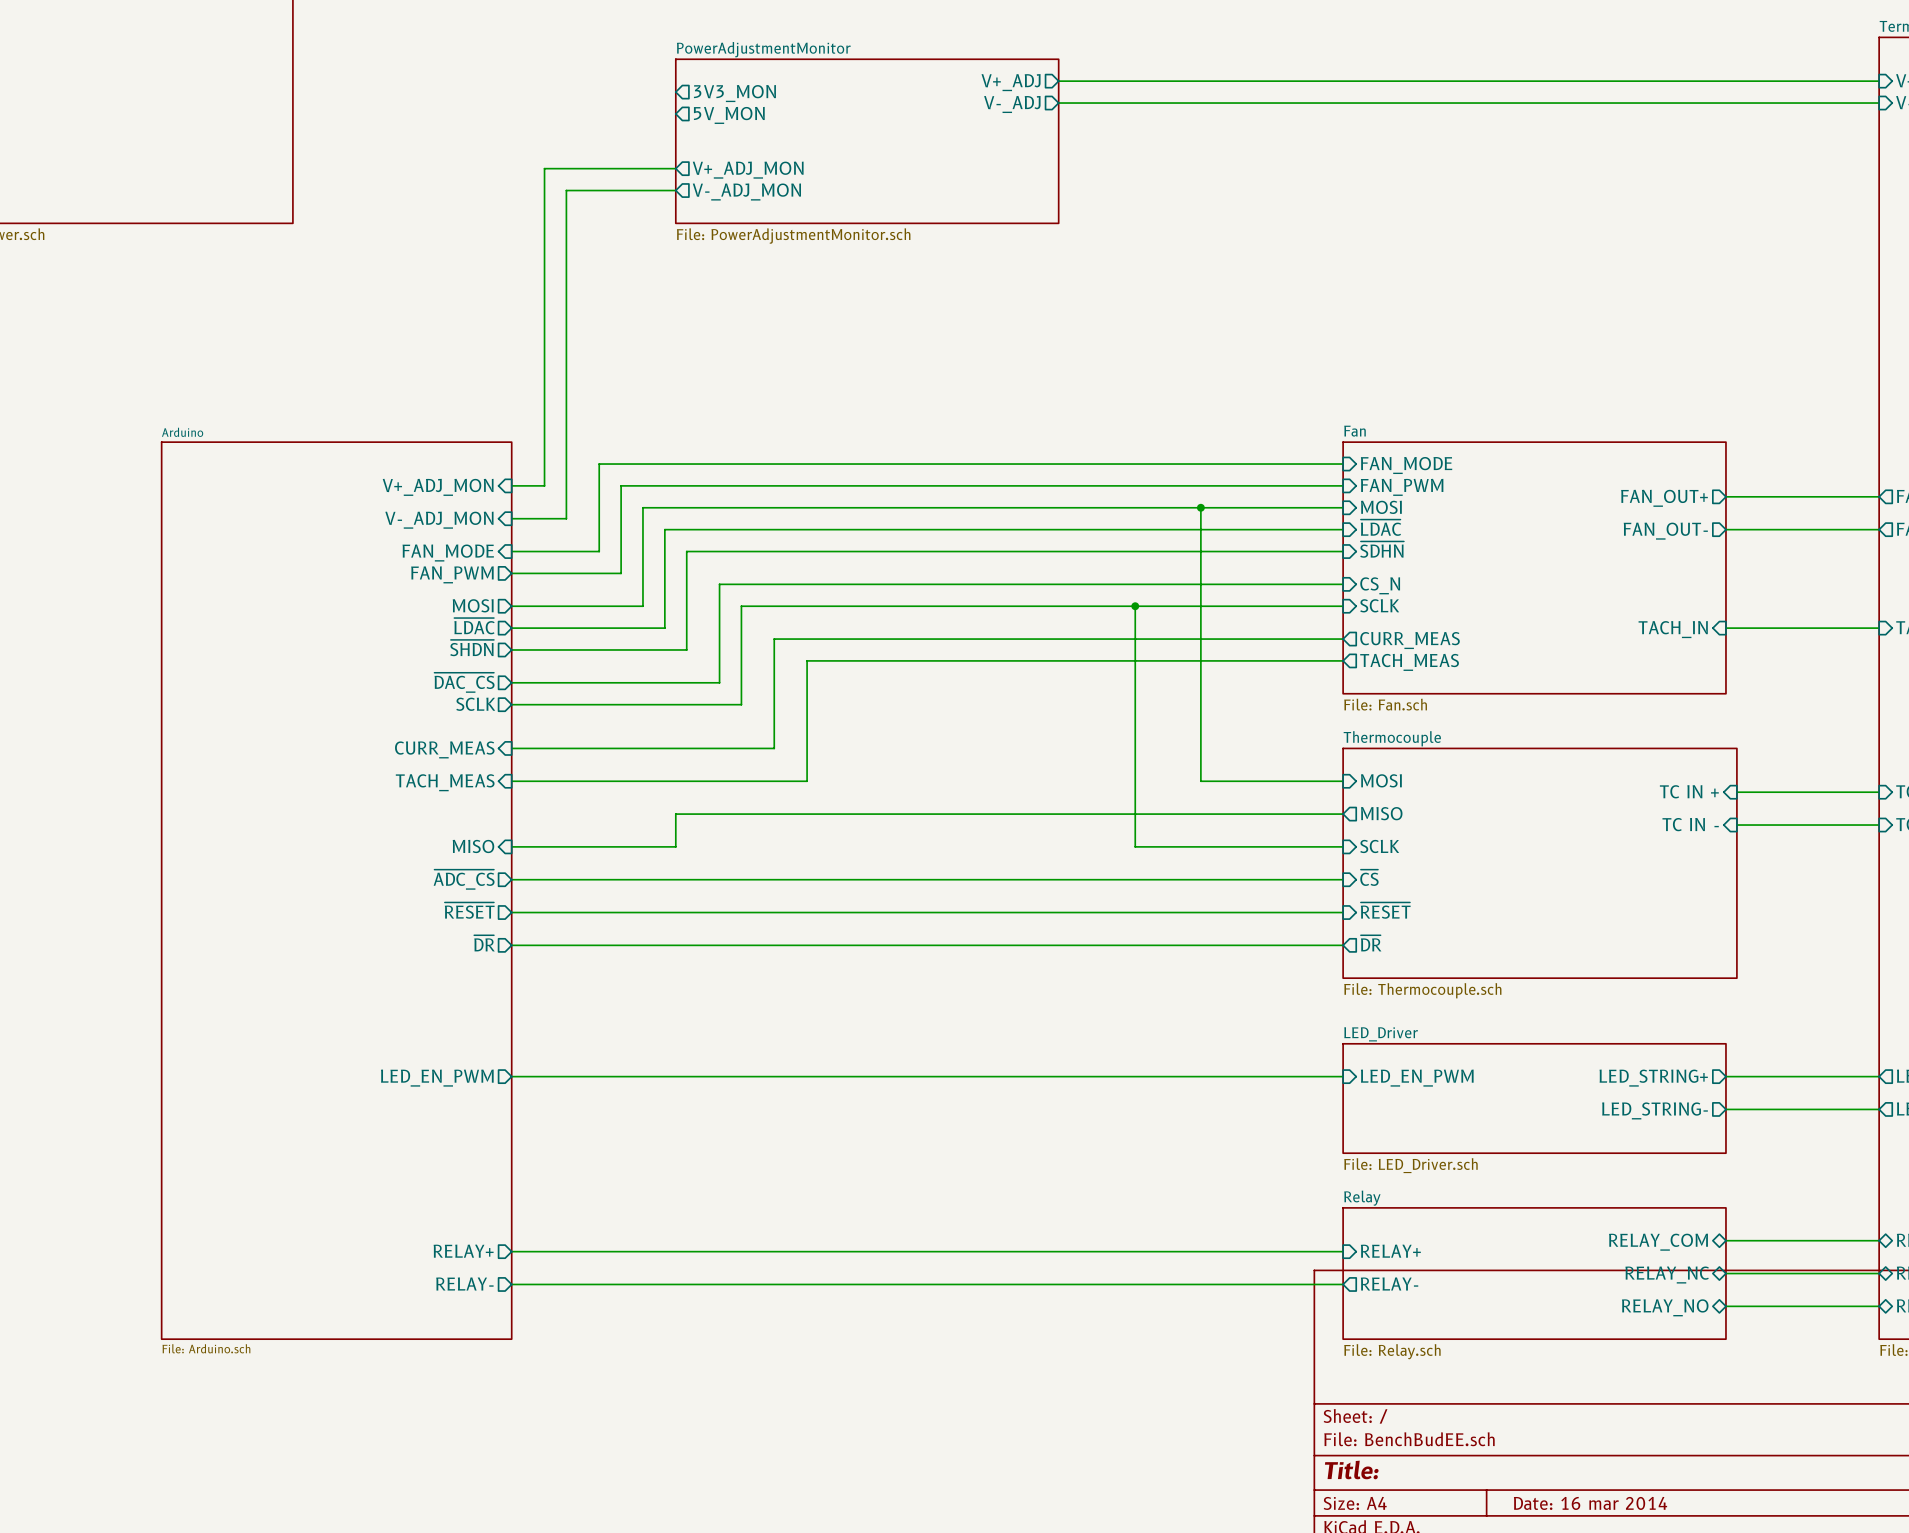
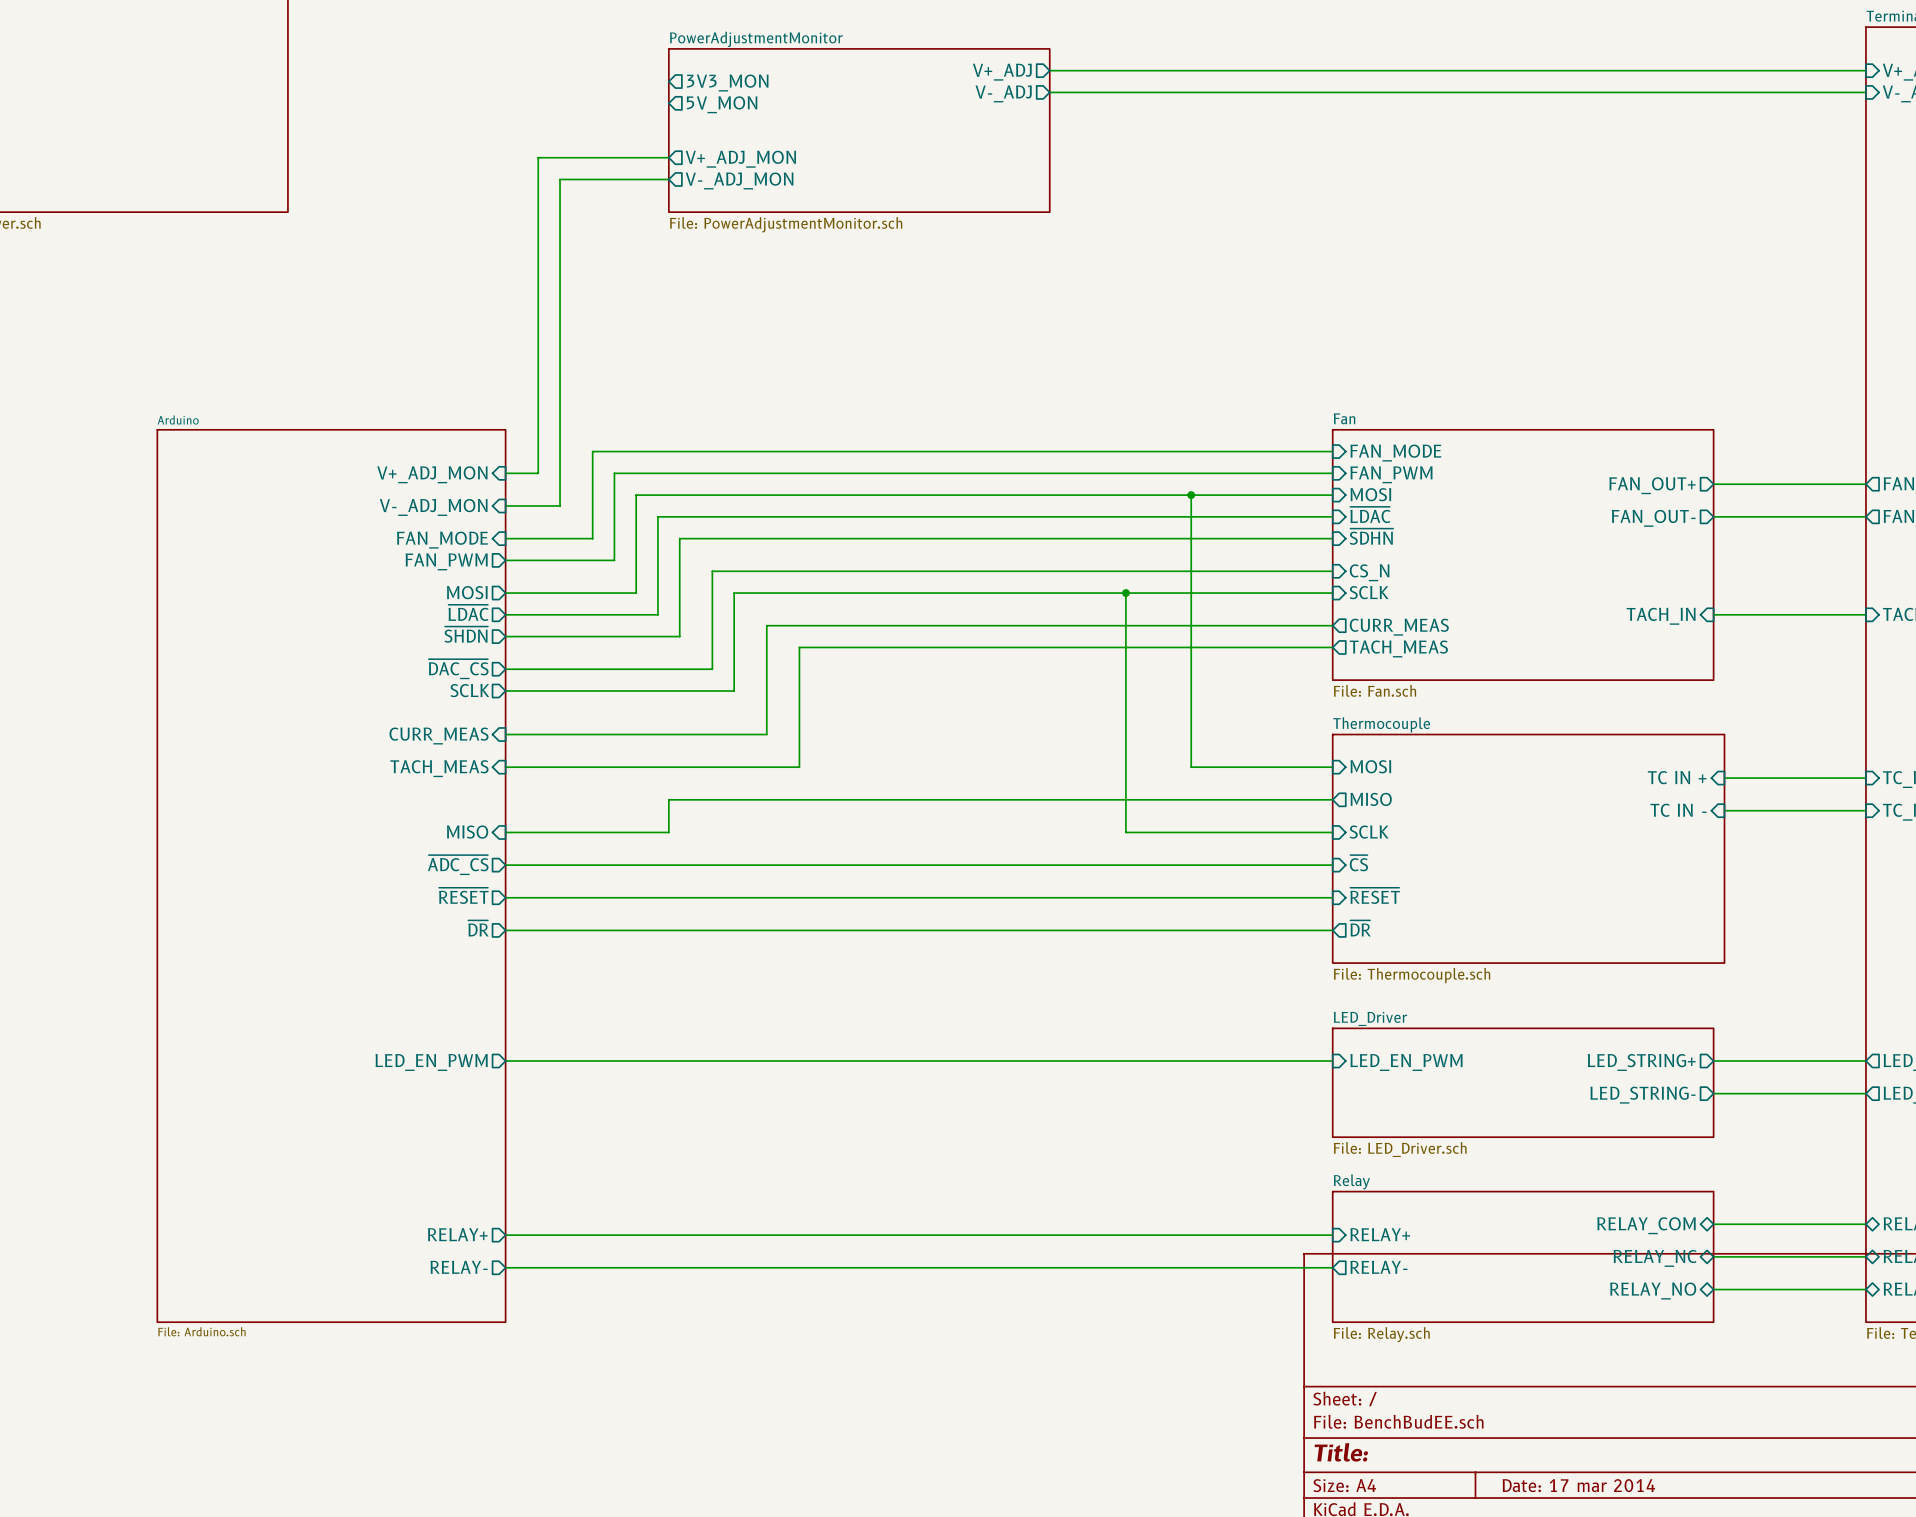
title block: Date: 16 mar 2014 (1590, 1503) -> Date: 17 mar 2014 (1578, 1485)

